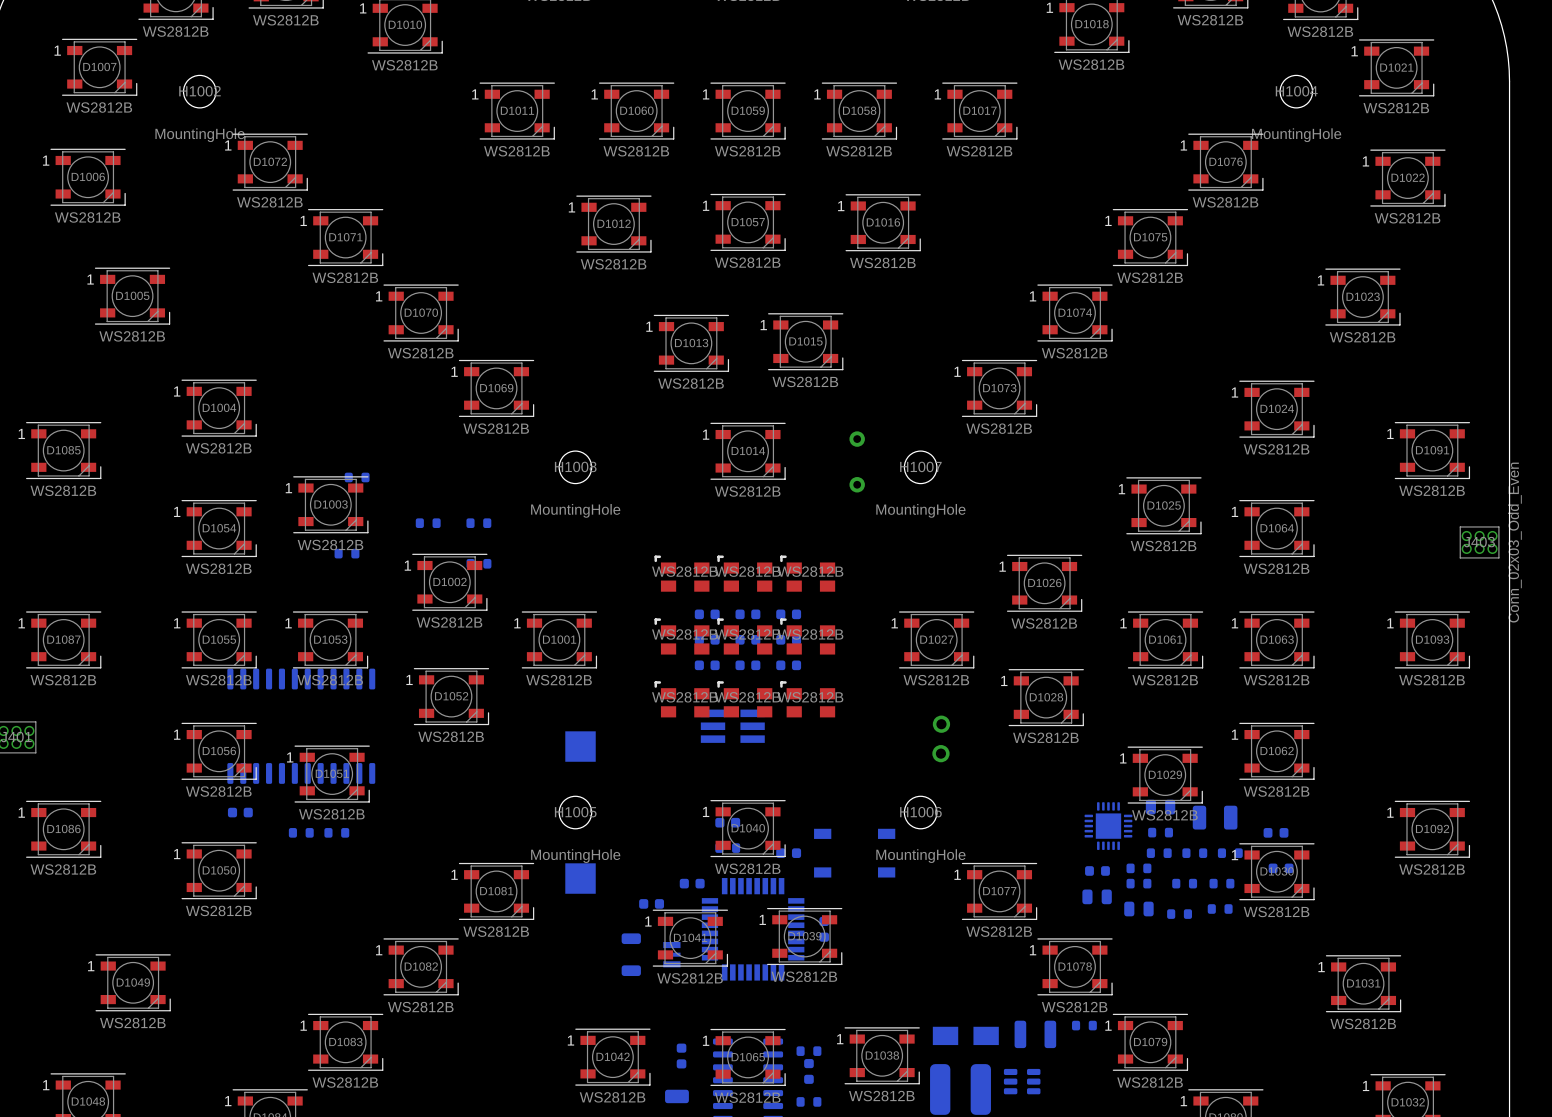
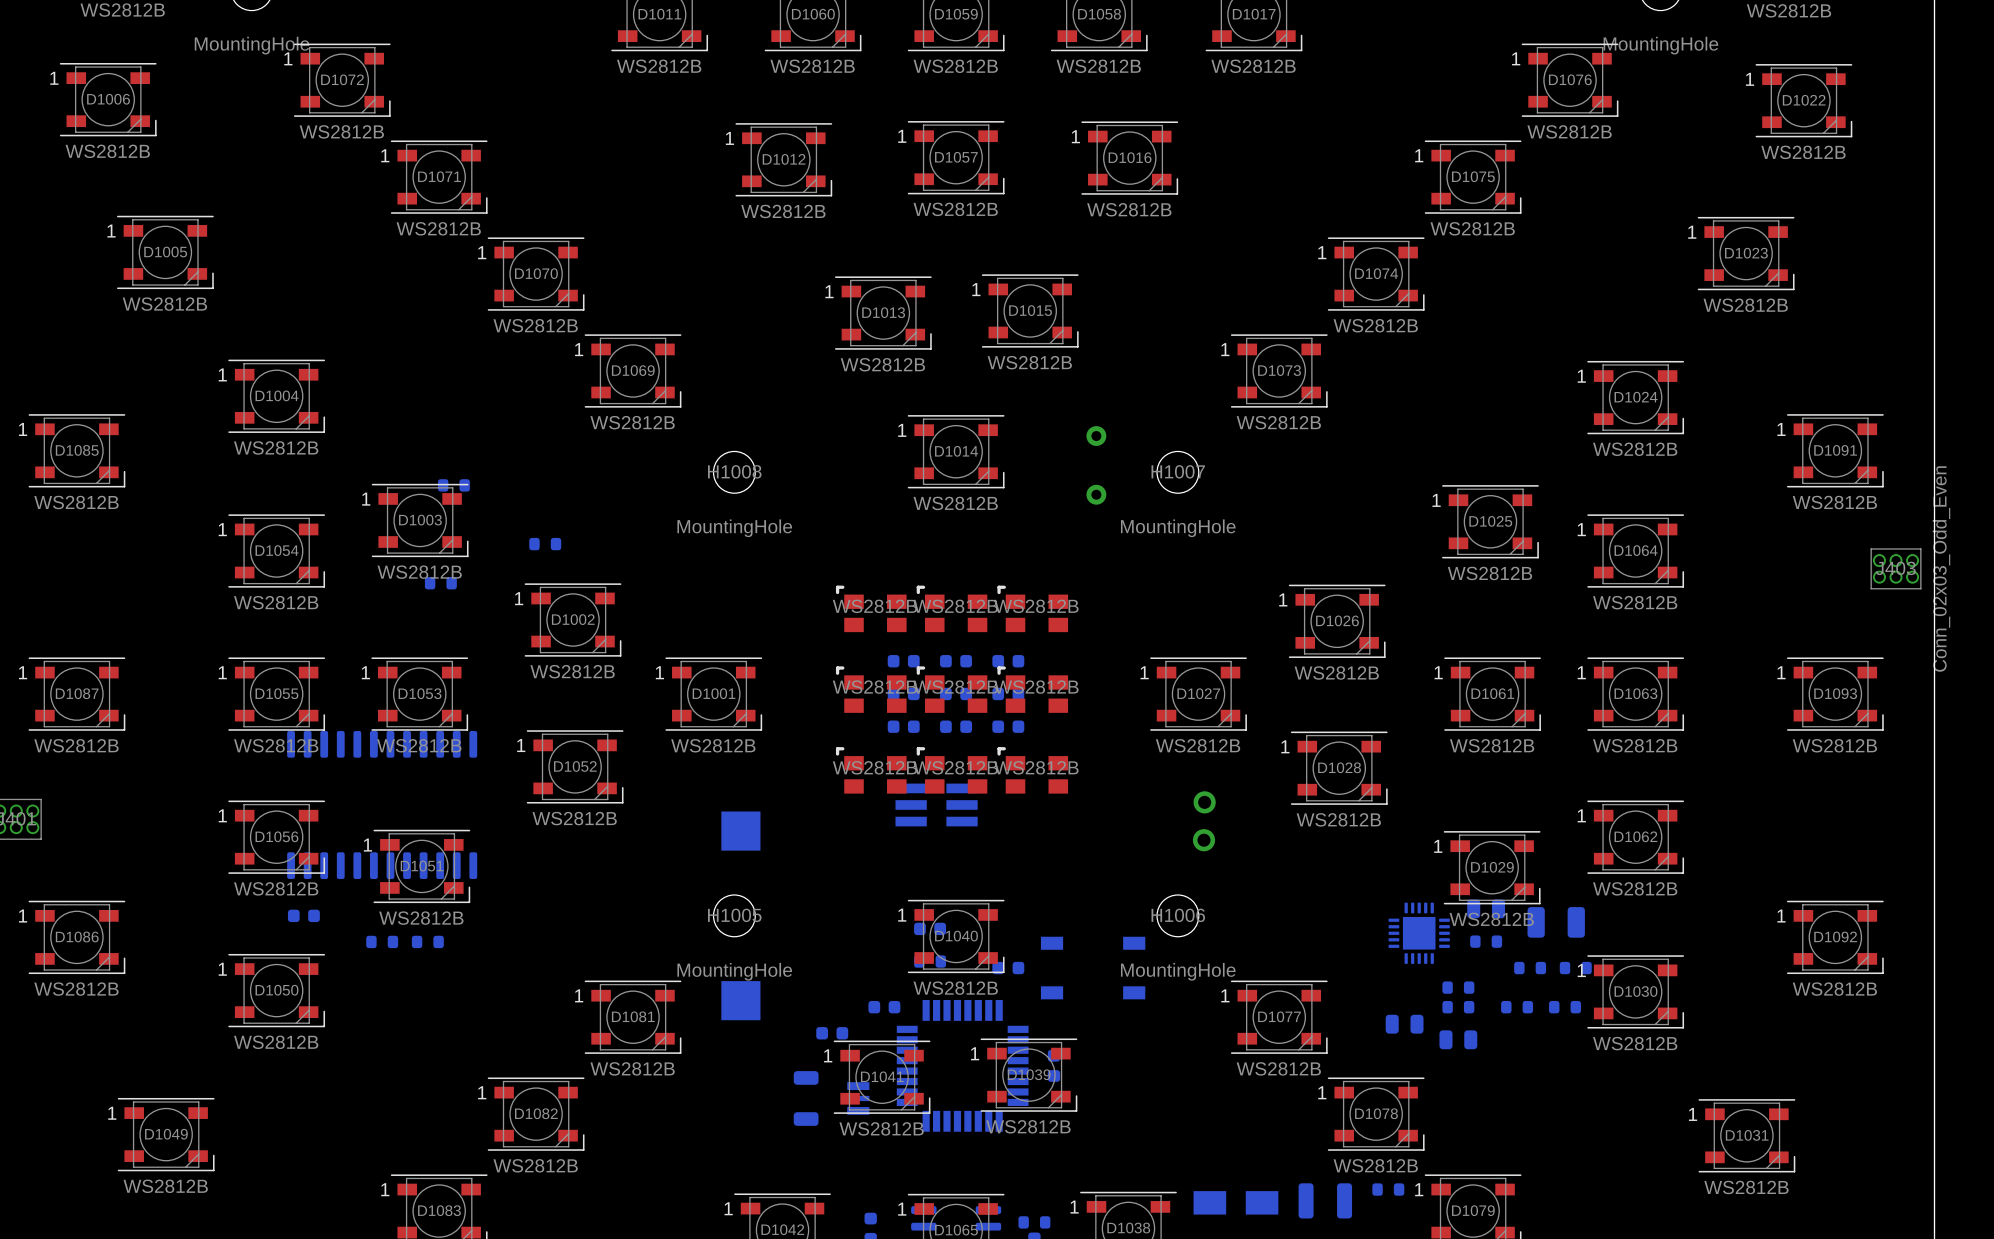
part: (478, 523) -> none
part: (478, 563) -> none
part: (1276, 832) -> none
part: (1159, 853) -> none
part: (1281, 868) -> none
part: (1097, 870) -> none
part: (1220, 909) -> none
part: (1179, 914) -> none

